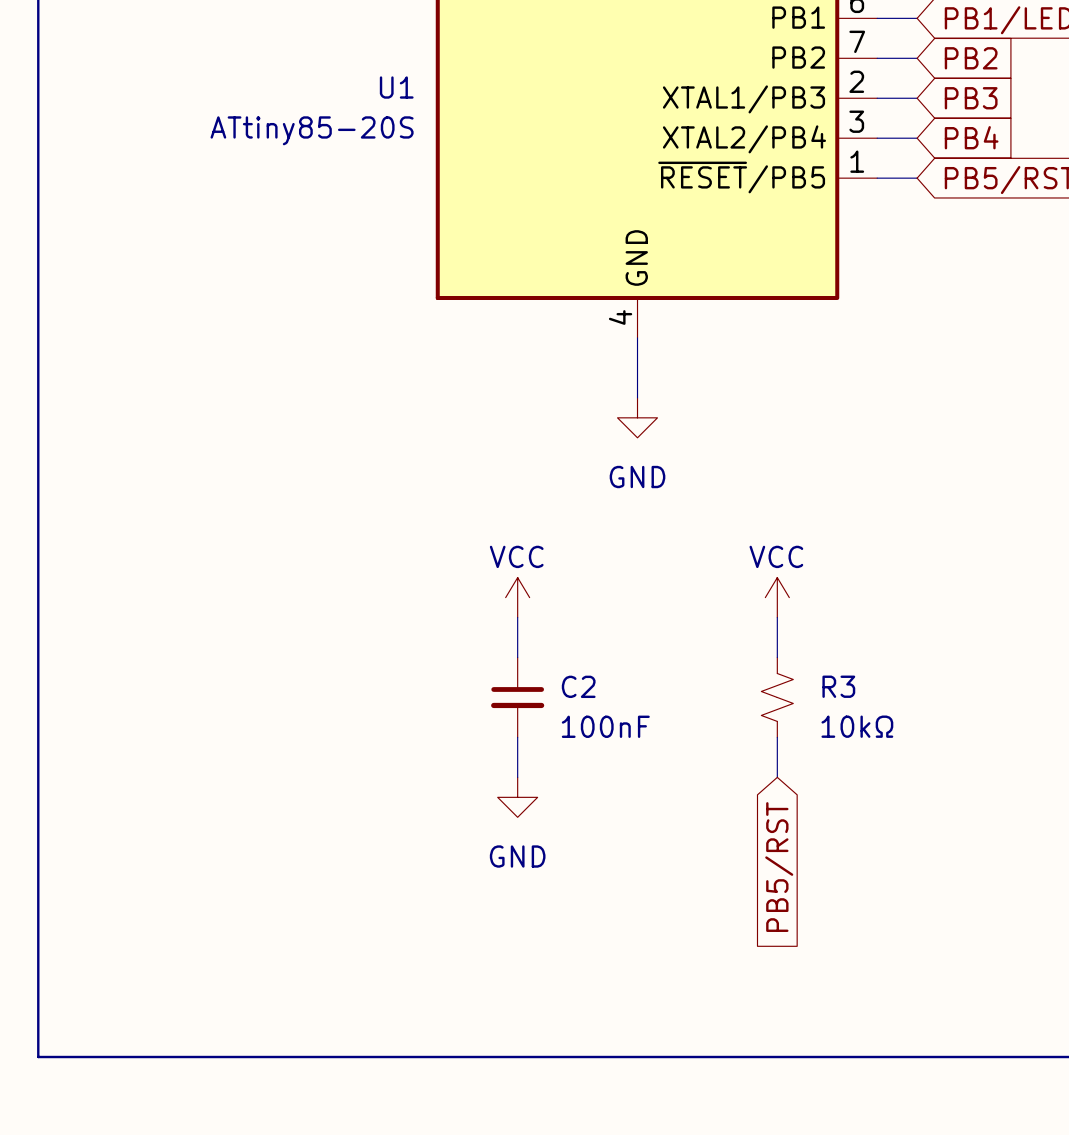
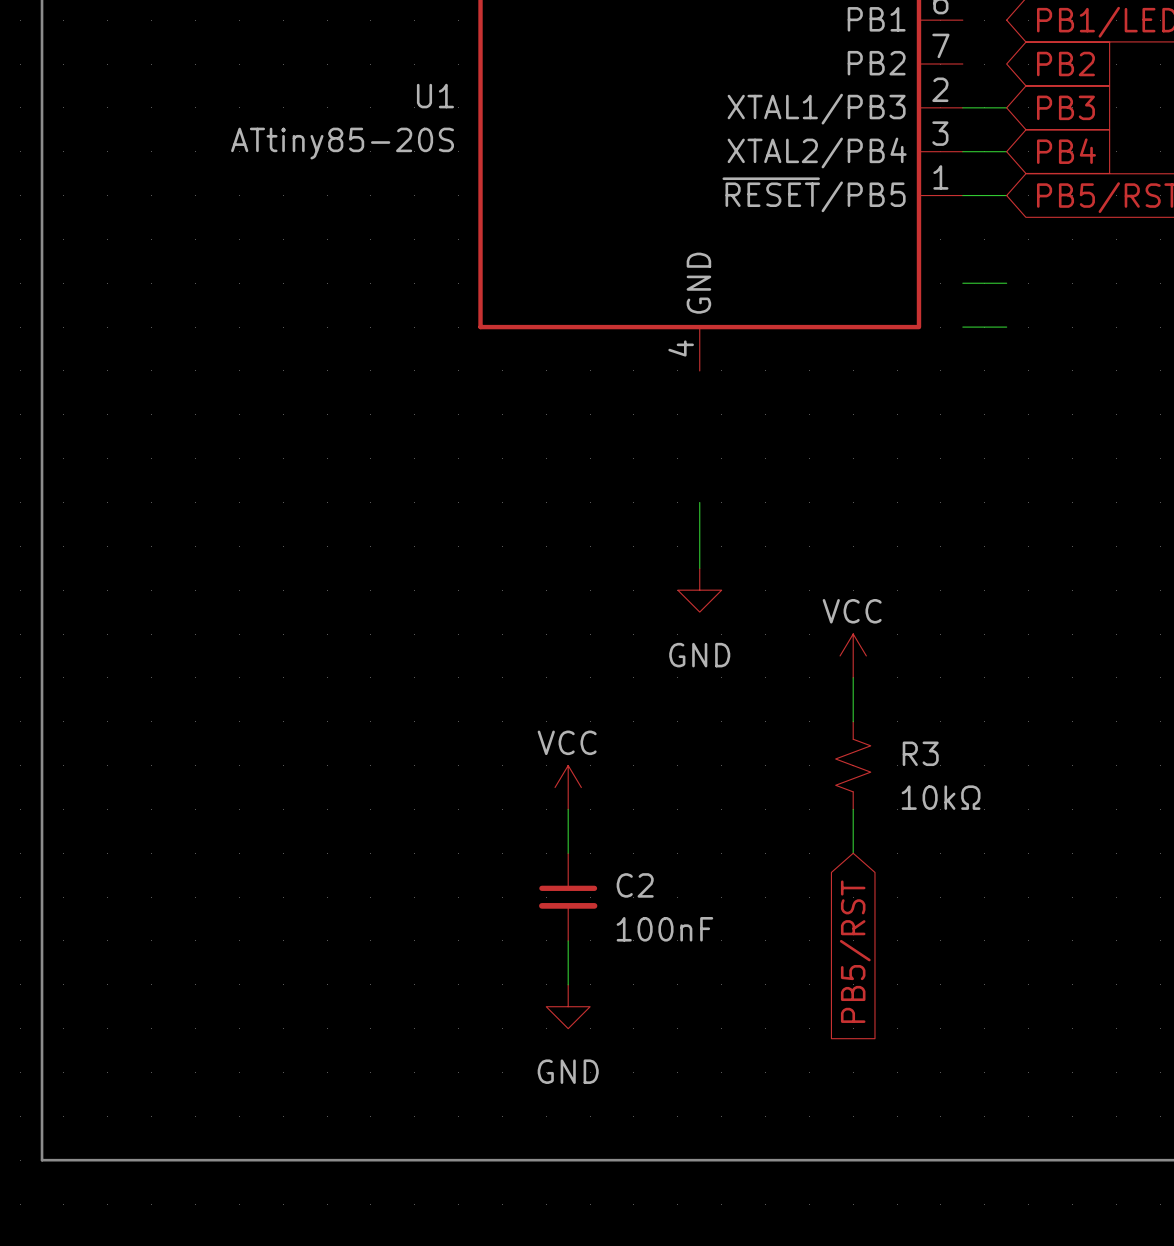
wire: (877, 18) (917, 18) -> (962, 283) (1006, 283)
wire: (877, 58) (917, 58) -> (962, 327) (1006, 327)
wire: (637, 337) (637, 397) -> (699, 502) (699, 568)
power symbol position: GND (637, 417) -> GND (699, 590)
power symbol position: VCC (517, 597) -> VCC (568, 787)
wire: (517, 617) (517, 657) -> (568, 940) (568, 984)
C2 position: (517, 697) -> (568, 897)
power symbol position: GND (517, 797) -> GND (568, 1006)

